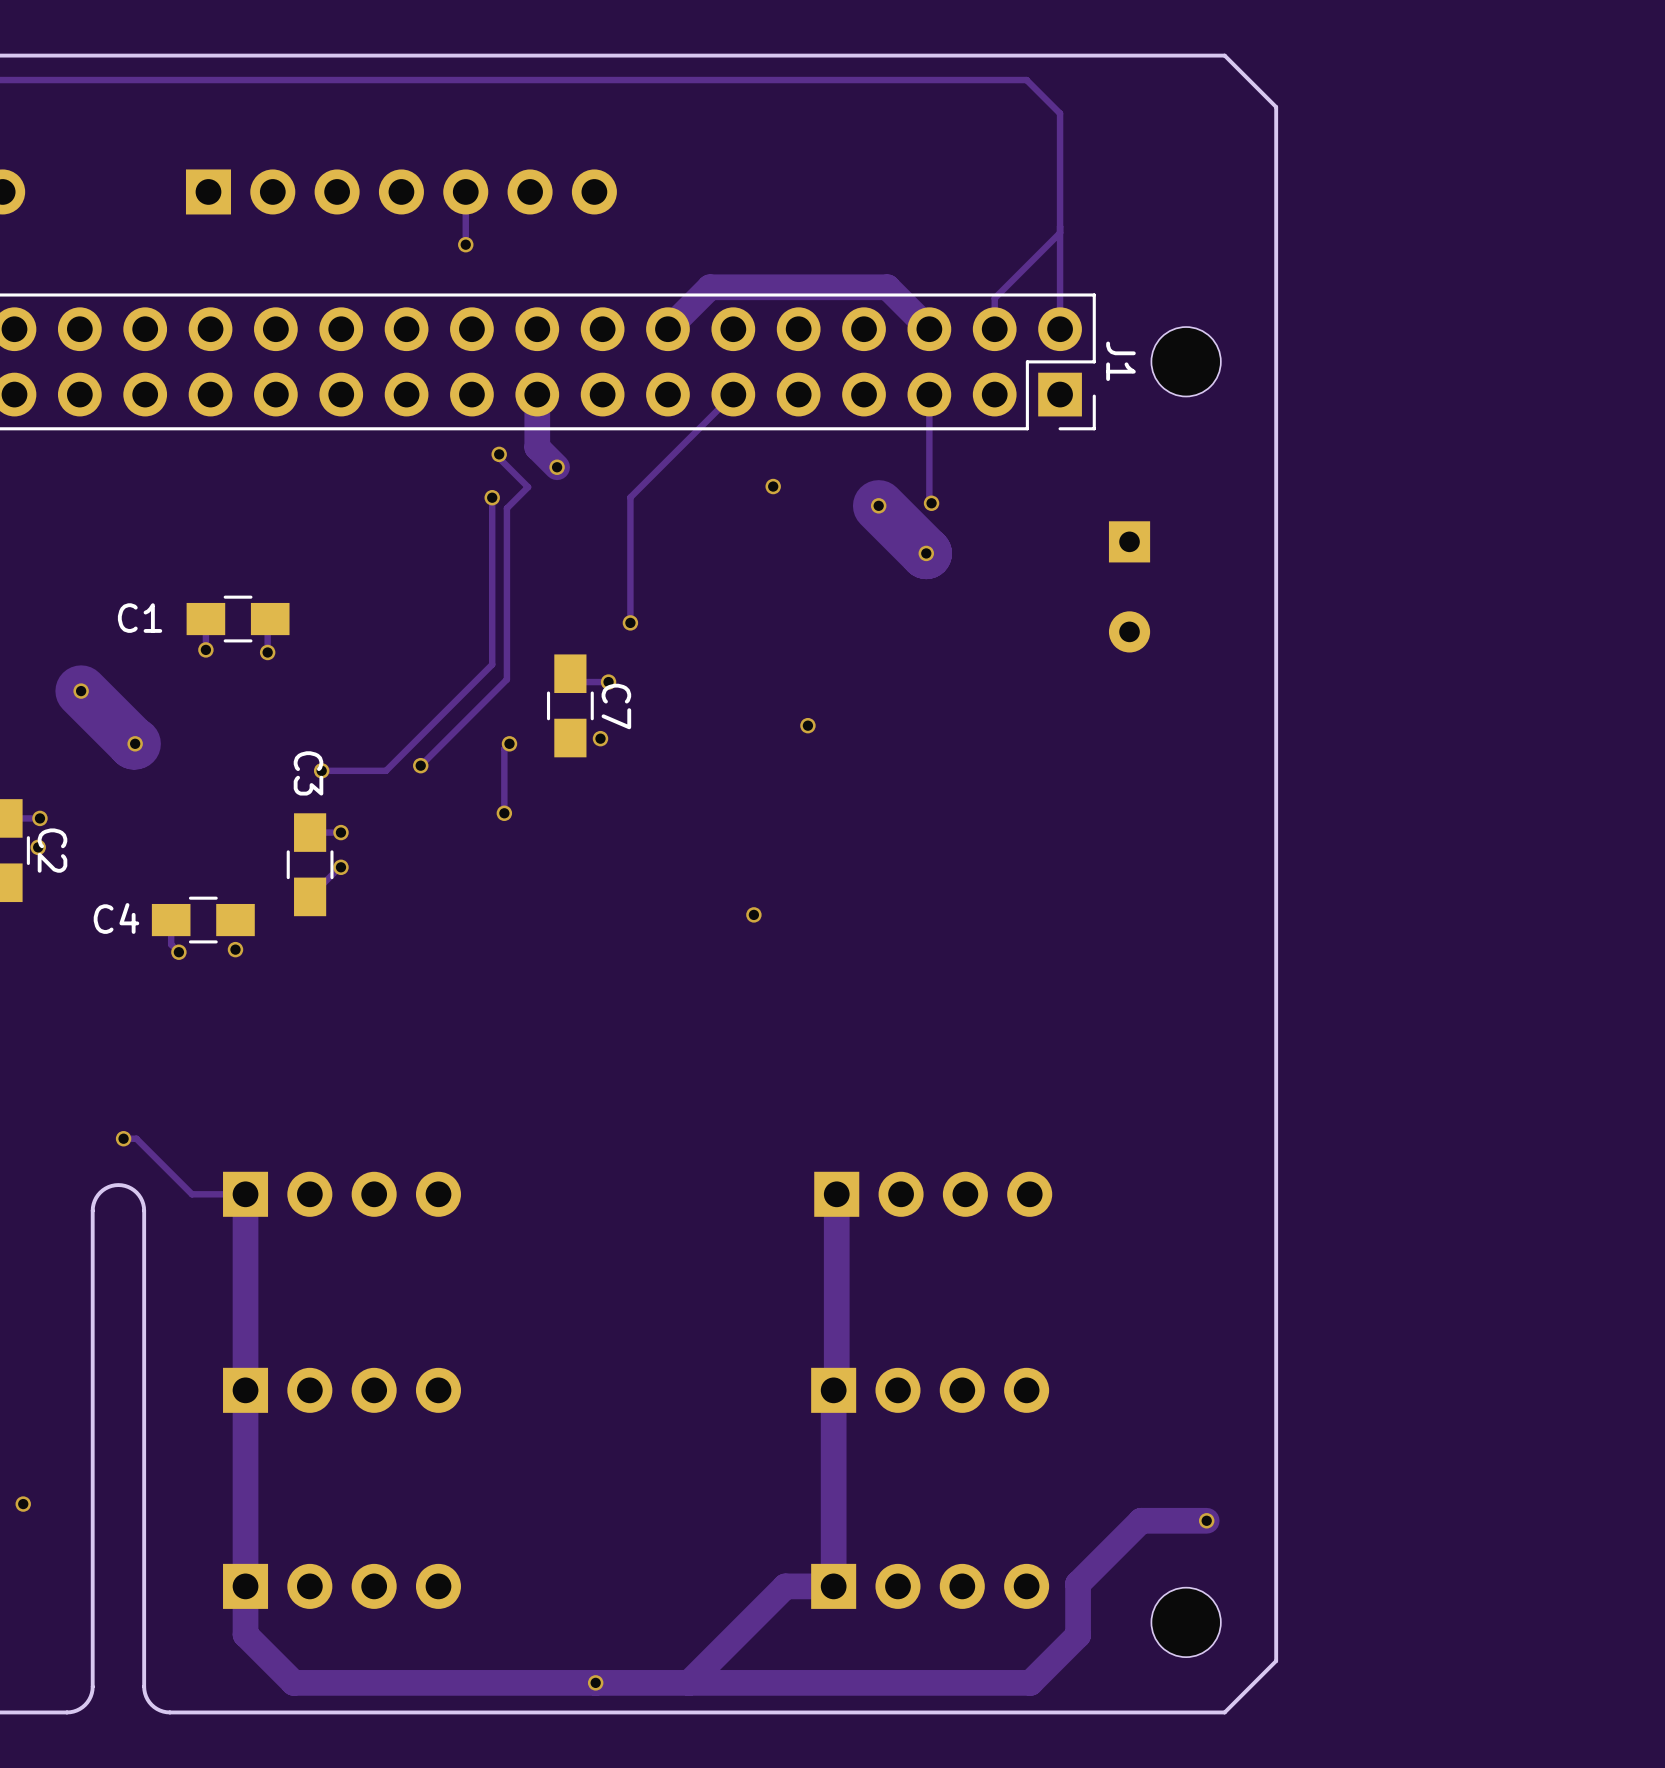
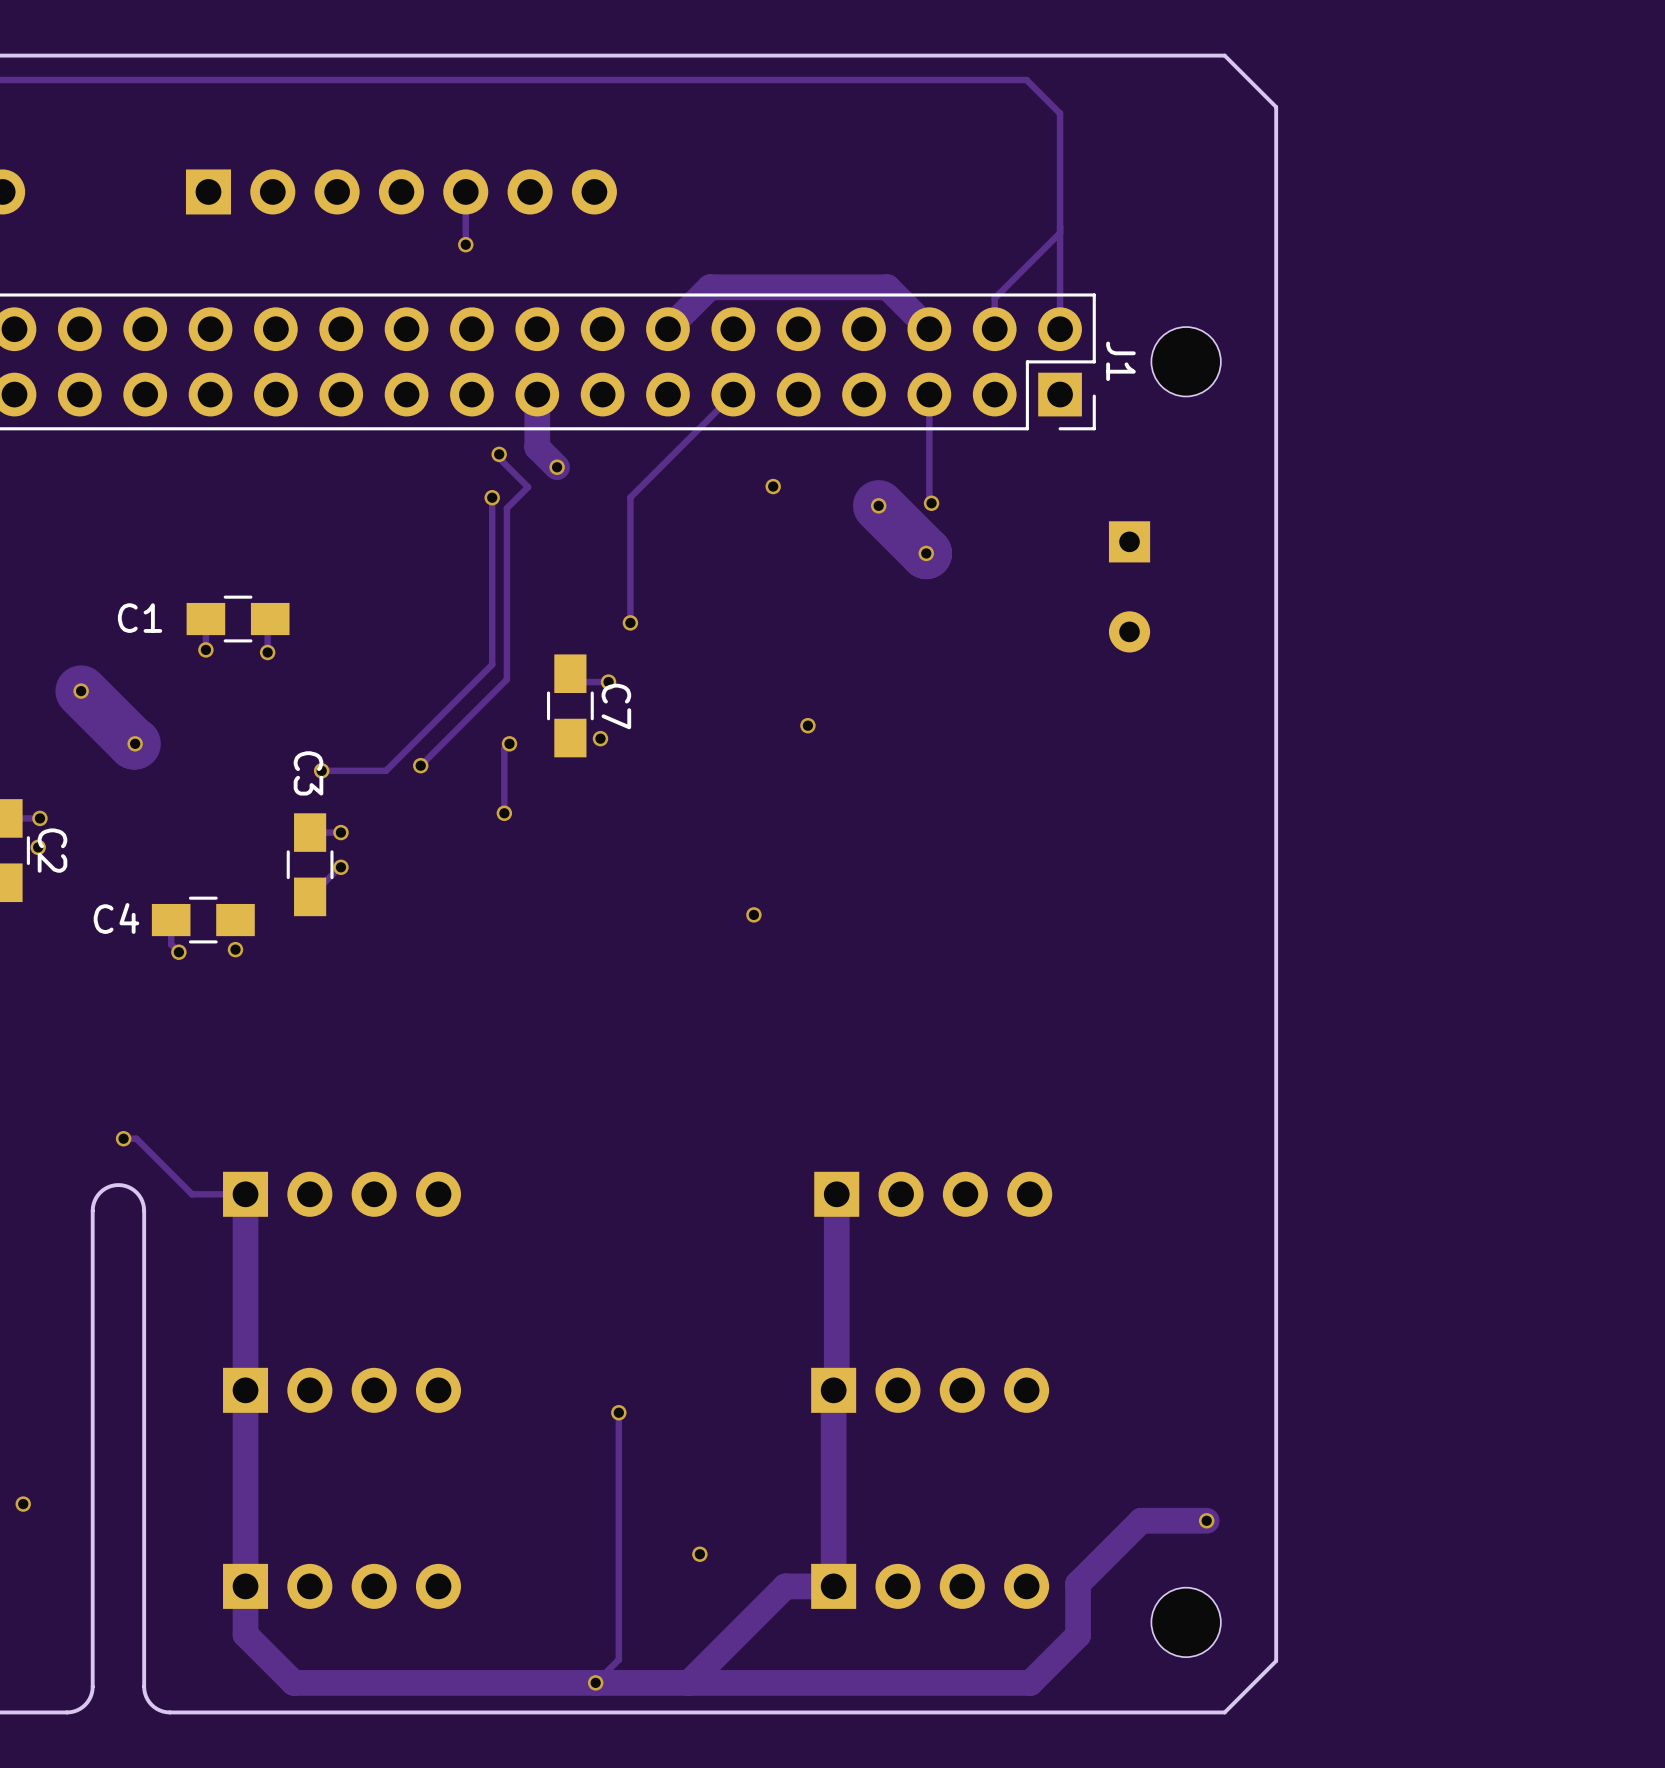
track: none -> (618, 1412) (618, 1659) (595, 1682)
via: none -> (618, 1412)
via: none -> (699, 1554)

